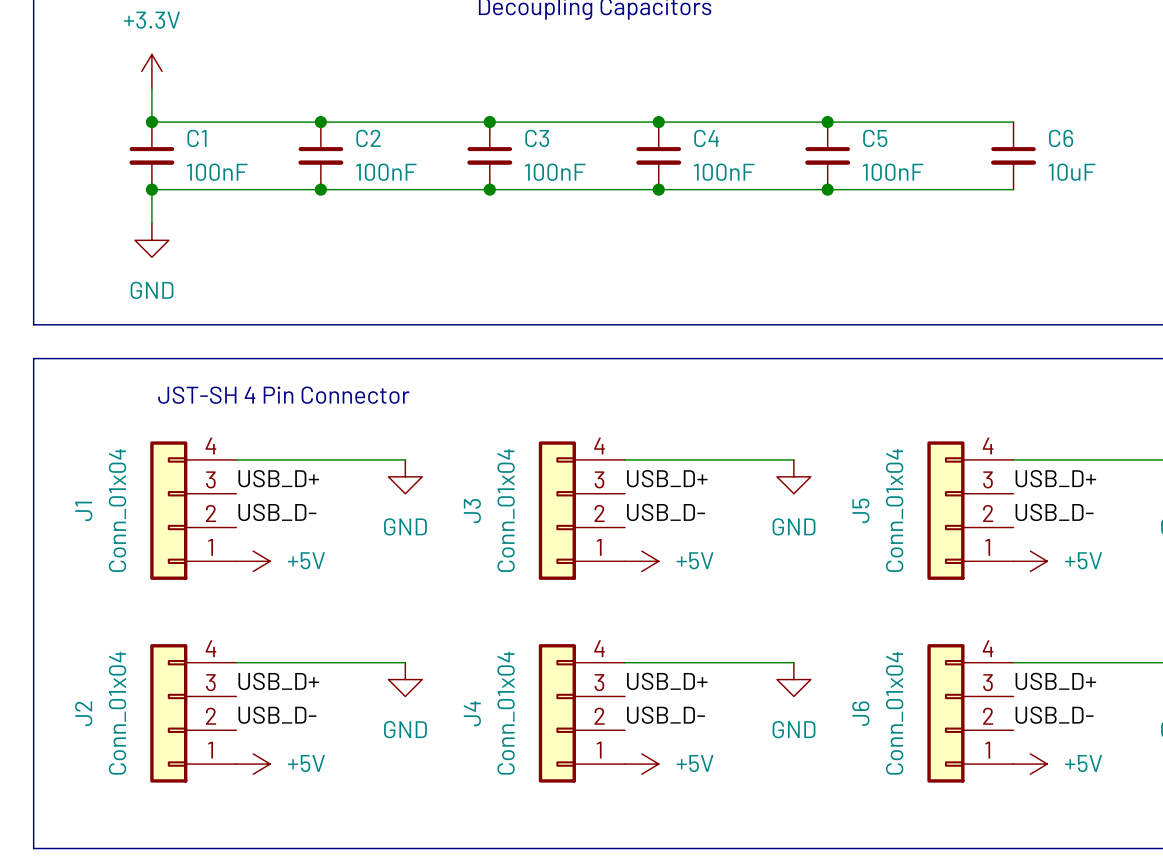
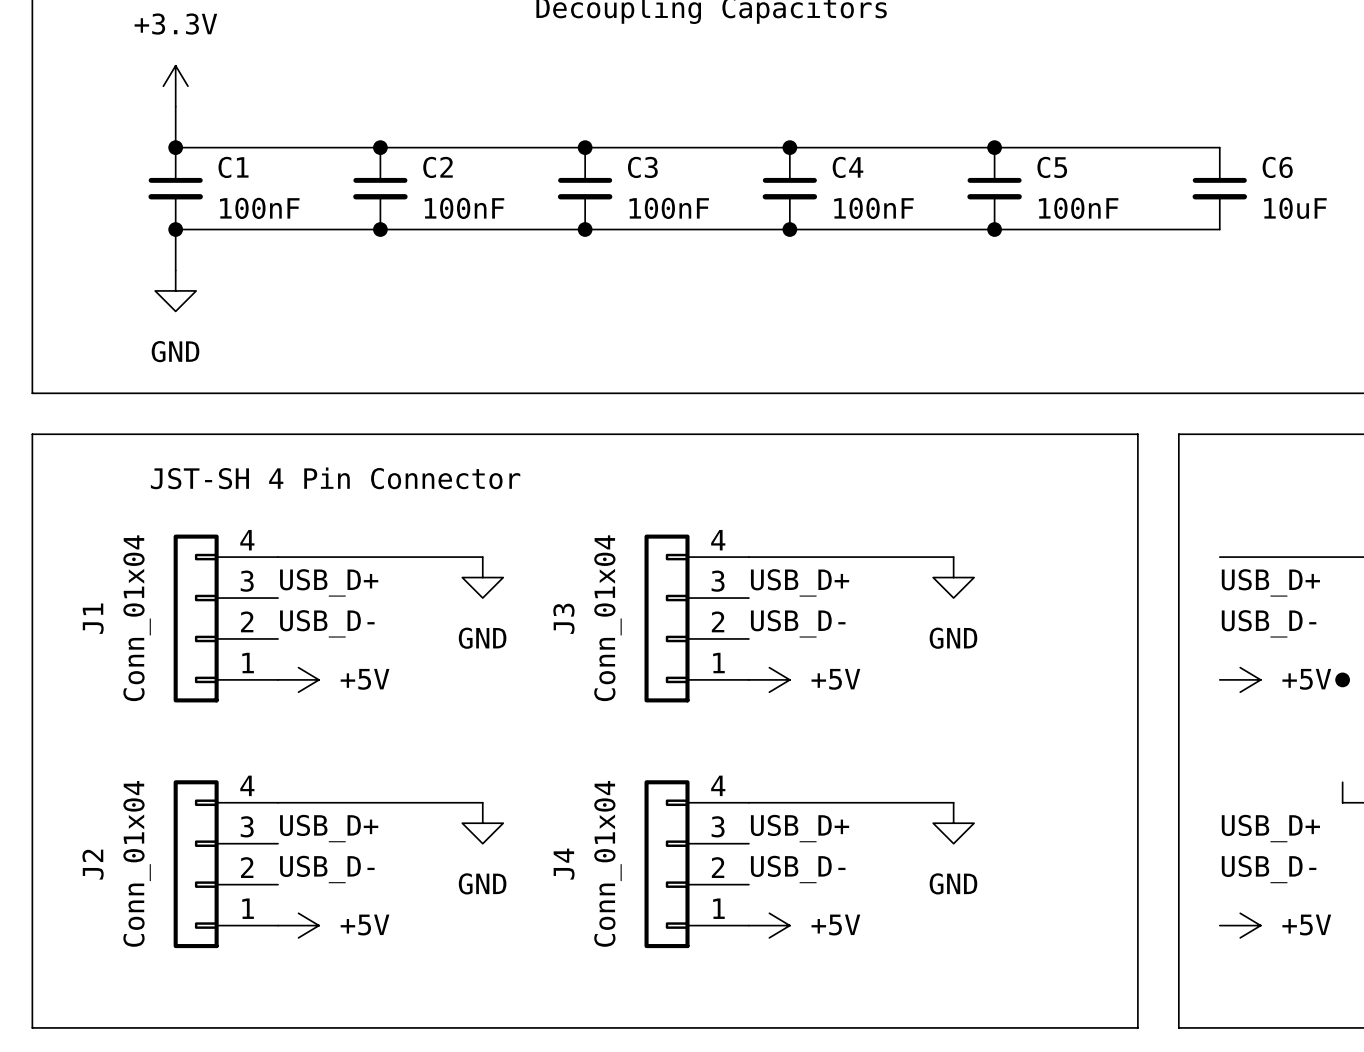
line: (945, 358) (979, 358) -> (1137, 434) (1137, 1027)
J5: Conn_01x04 (970, 510) -> none
junction: none -> (1342, 679)
wire: (1013, 662) (1114, 662) -> (1342, 782) (1342, 802)
J6: Conn_01x04 (970, 713) -> none
line: (945, 848) (979, 848) -> (1178, 434) (1178, 1027)

